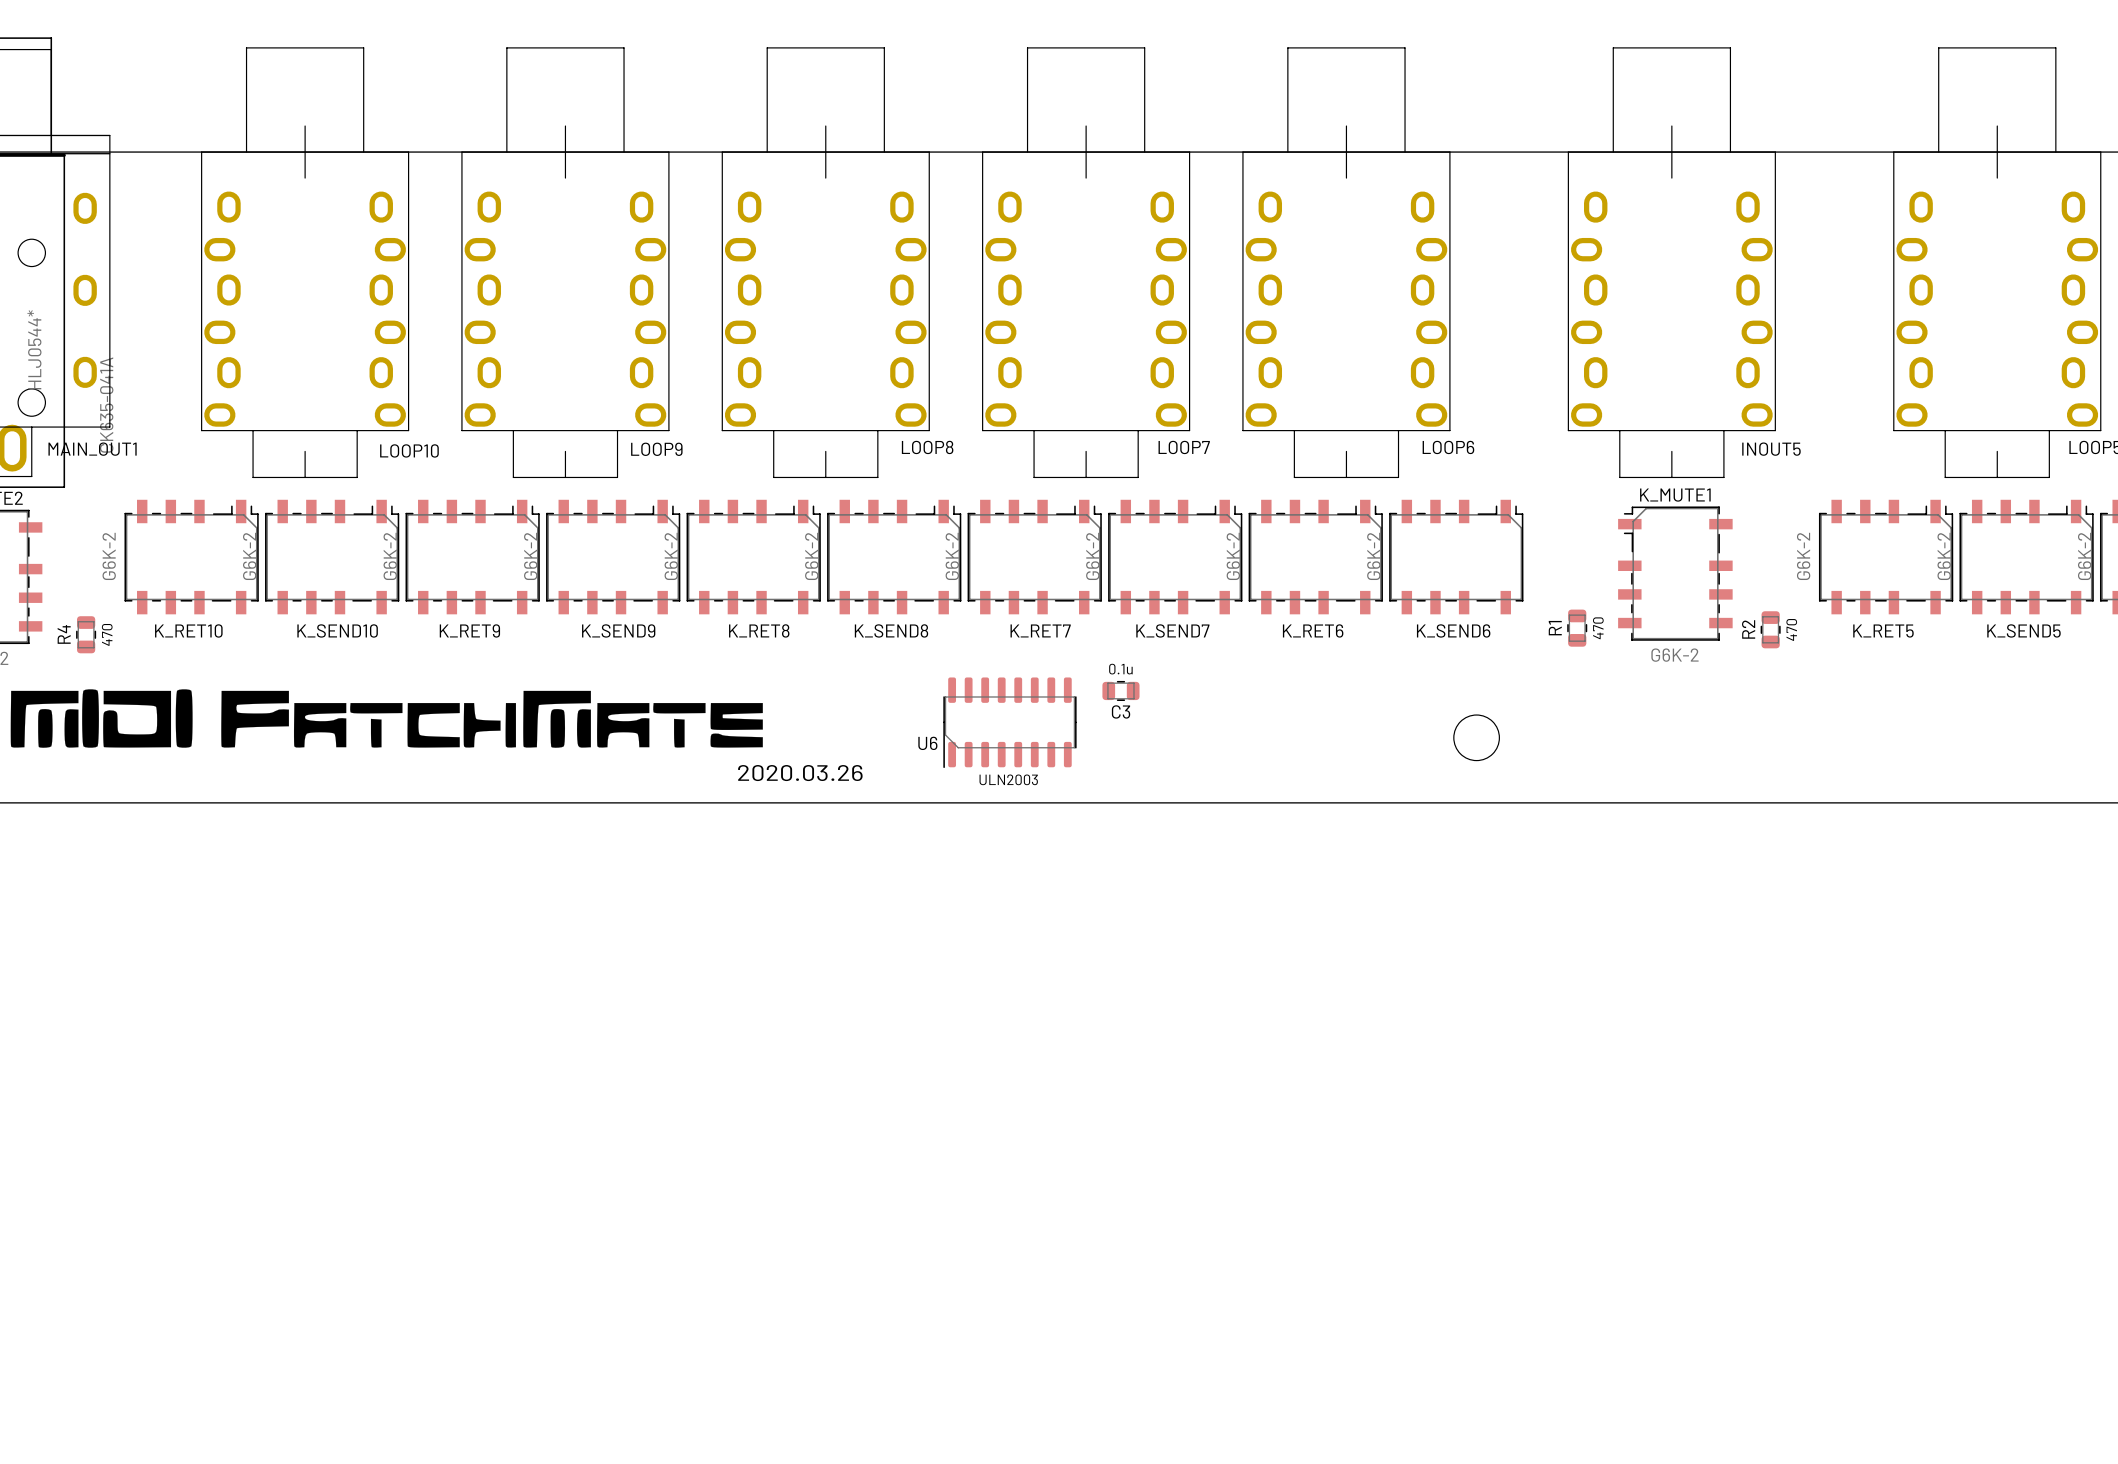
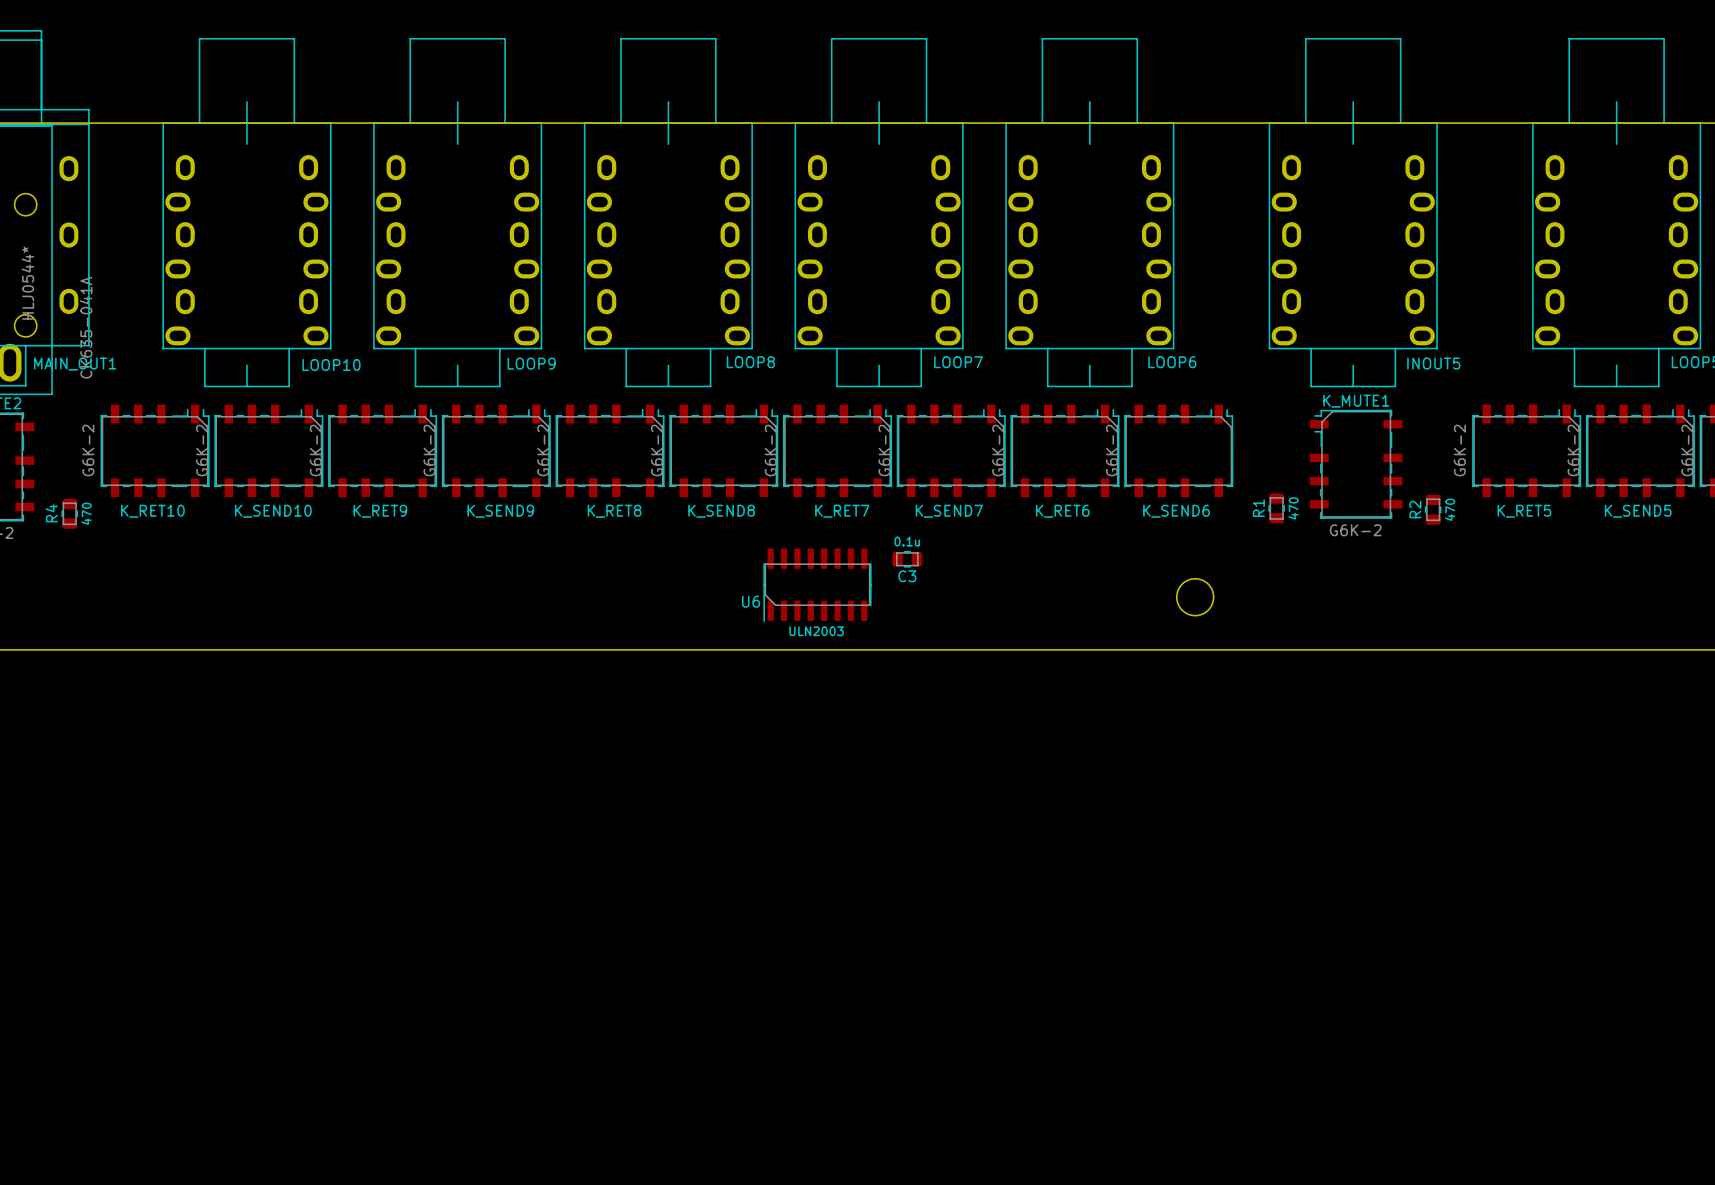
drawing: [10, 689, 763, 748] -> none
text: 2020.03.26 (800, 773) -> none

